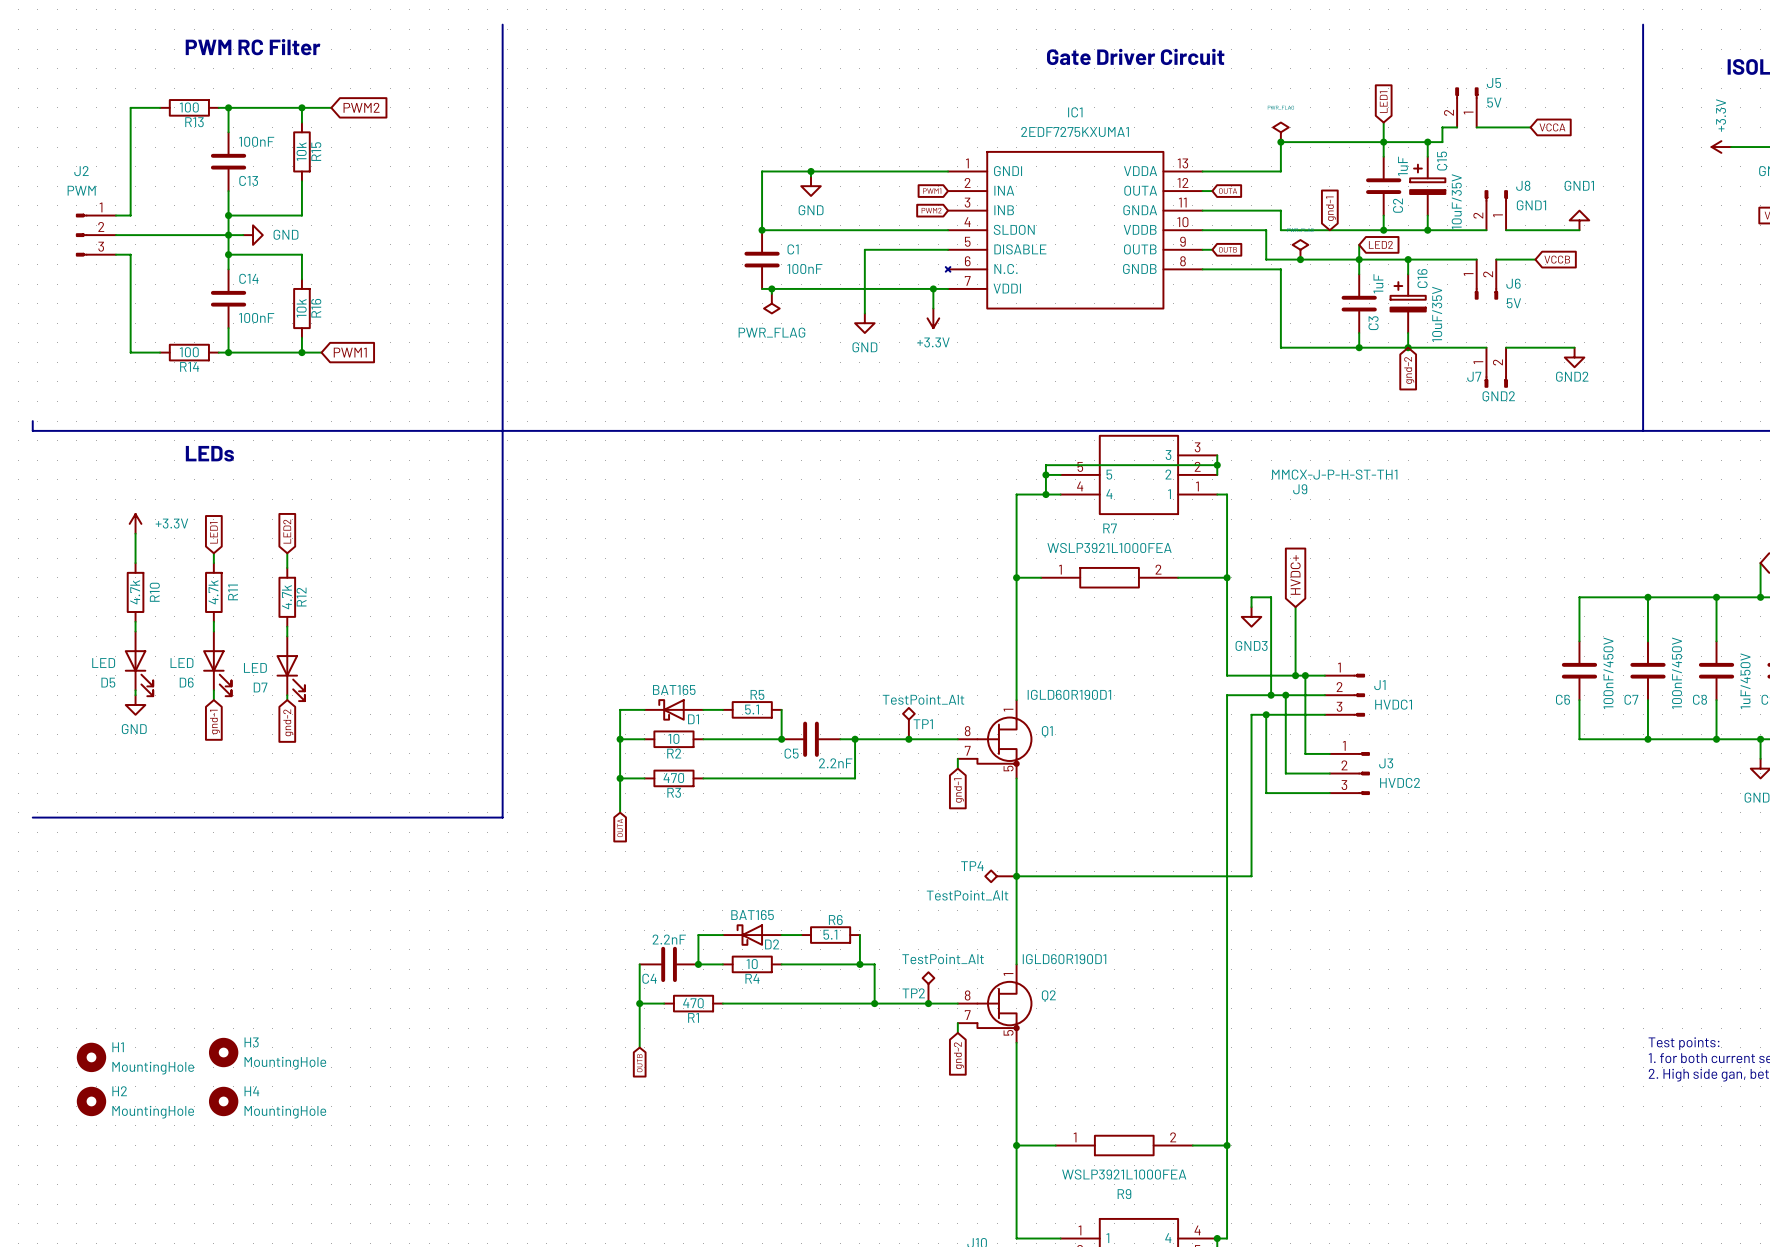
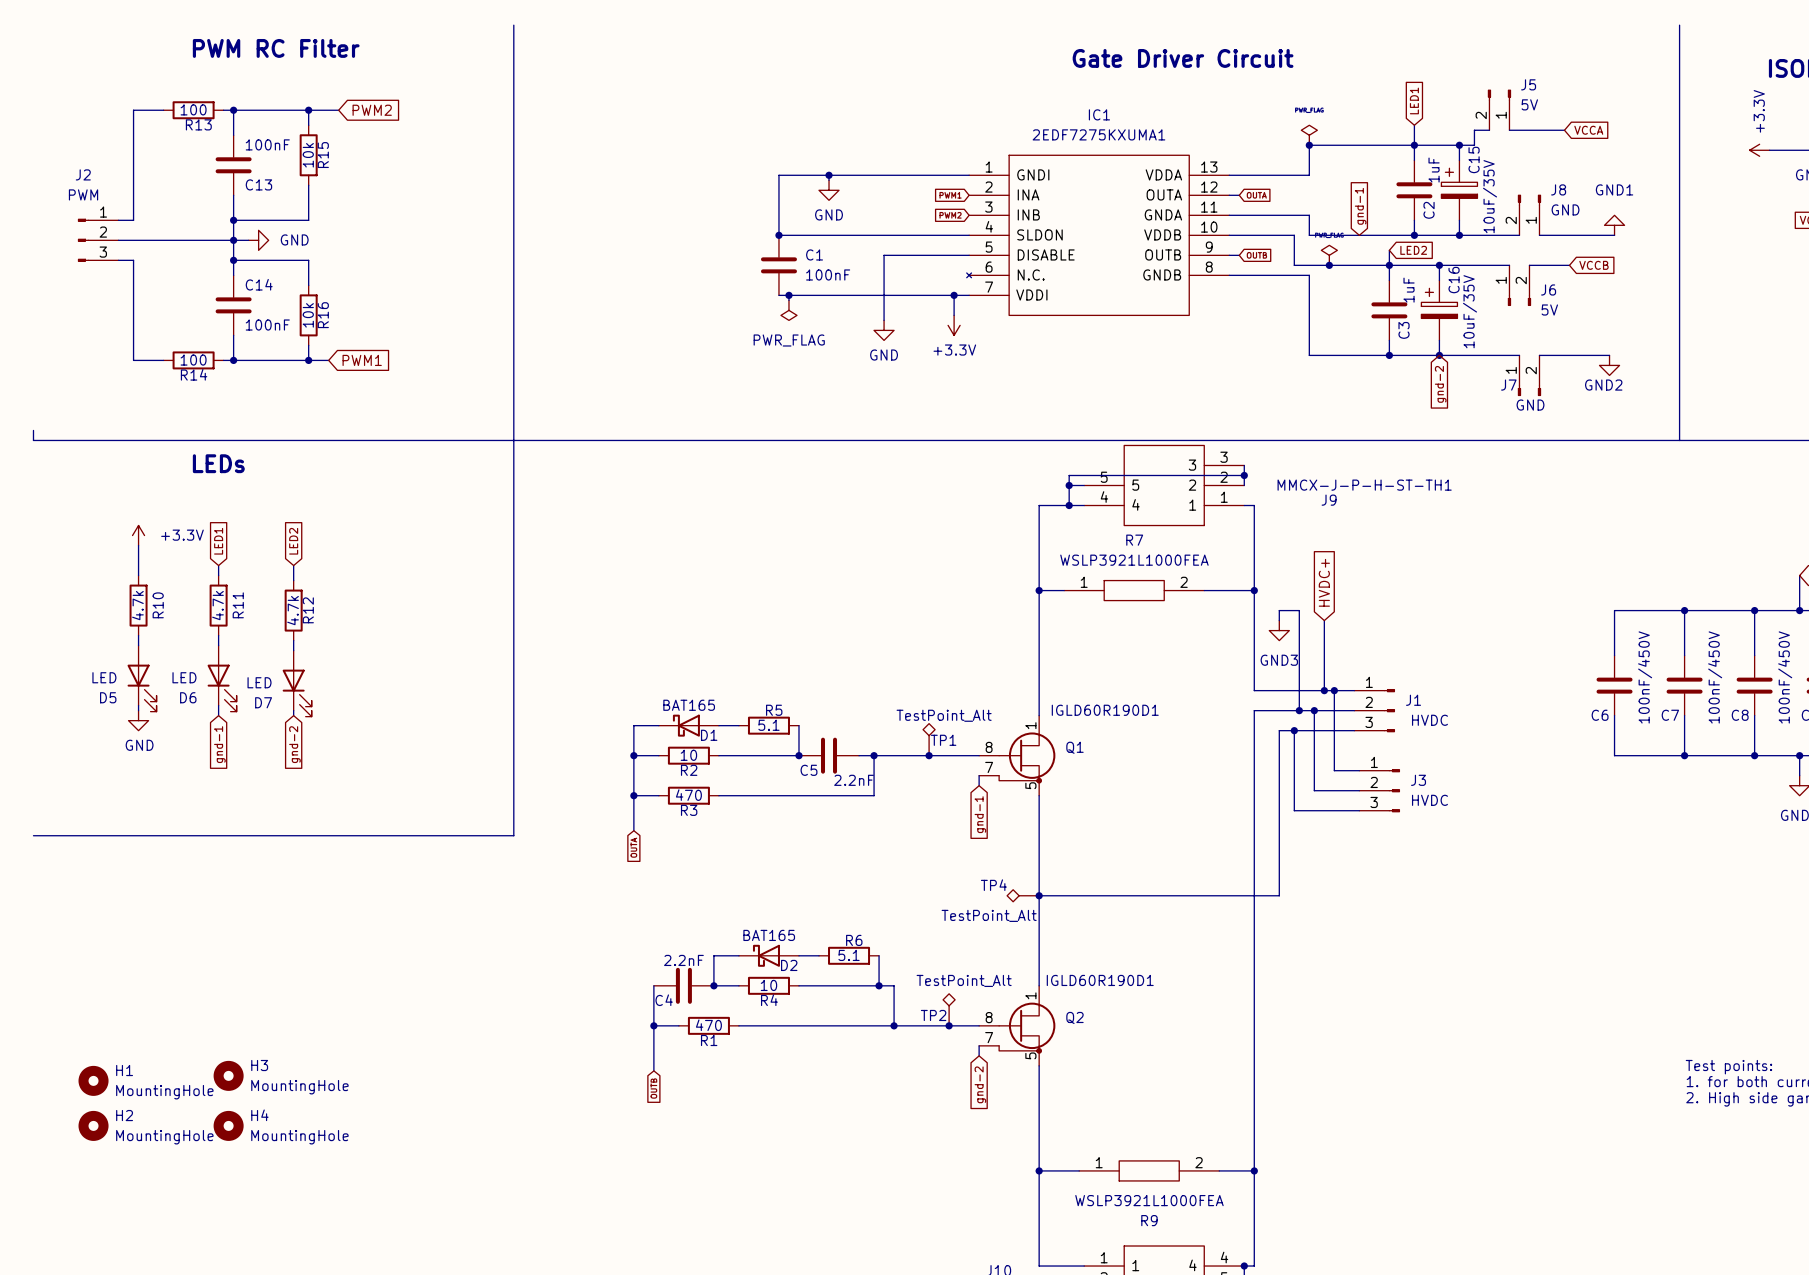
J8 value: GND1 (1531, 205) -> GND (1565, 209)
J7 value: GND2 (1498, 396) -> GND (1530, 405)
C8 value: 1uF/450V (1745, 681) -> 100nF/450V (1785, 677)
J1 value: HVDC1 (1393, 704) -> HVDC (1429, 720)
J3 value: HVDC2 (1400, 782) -> HVDC (1429, 800)

